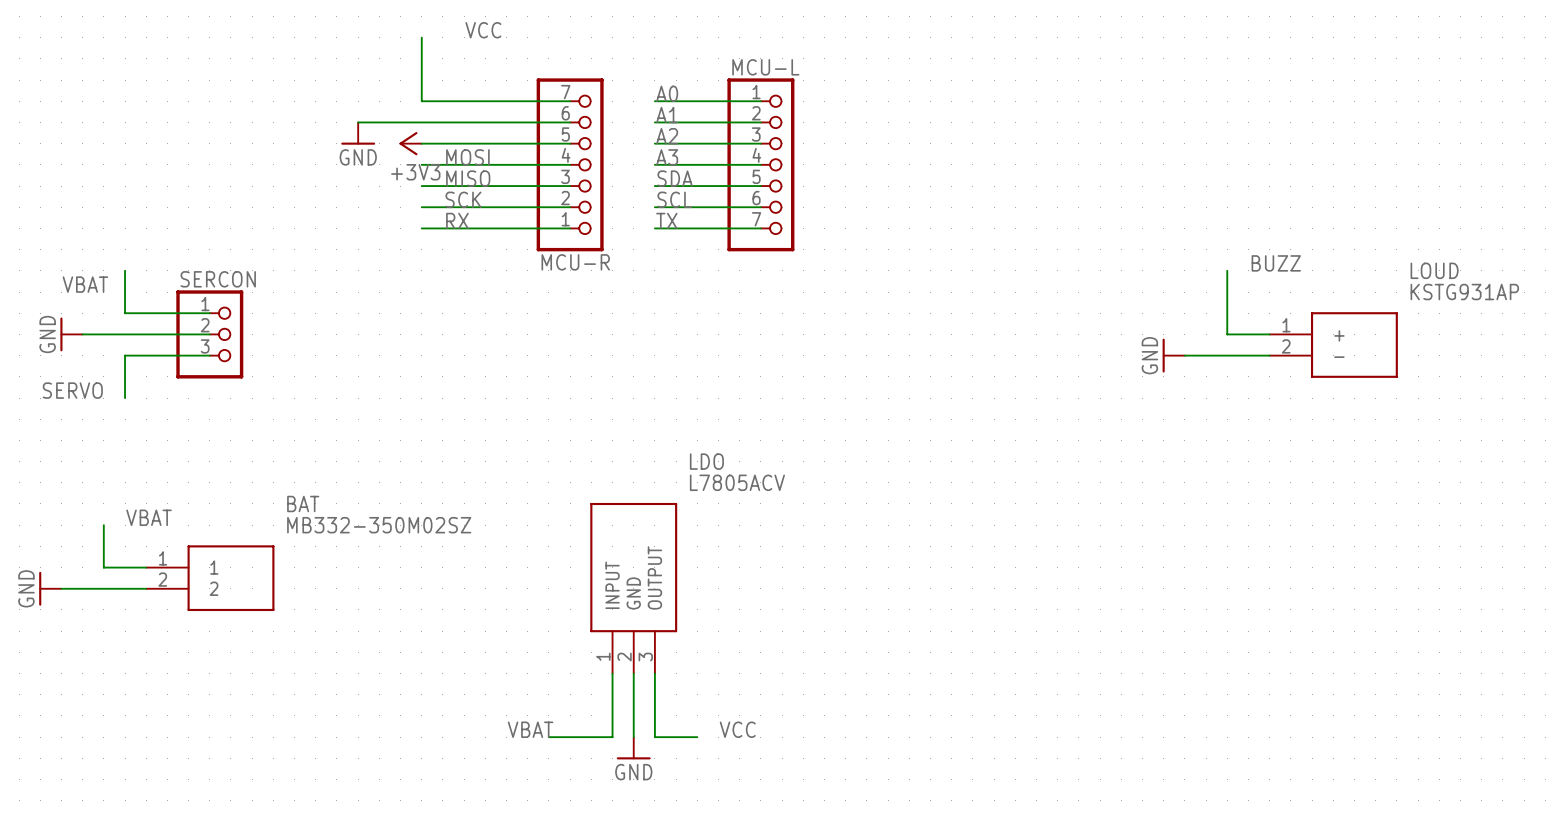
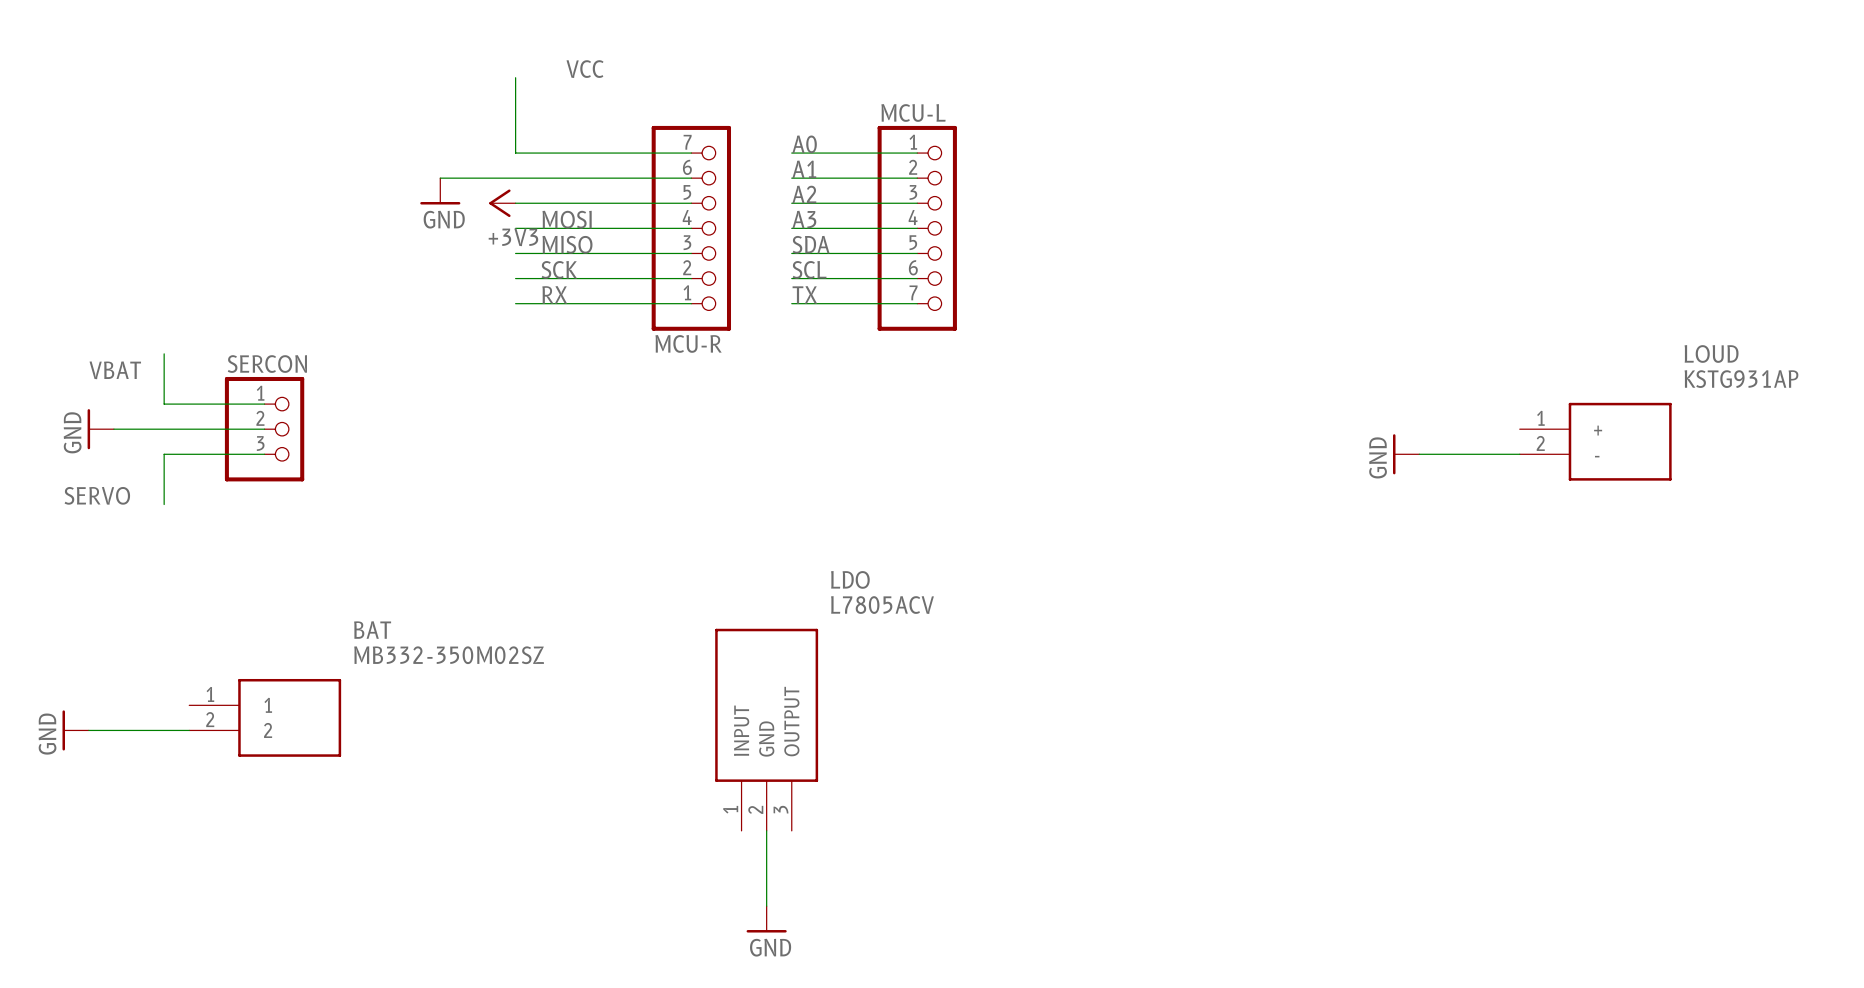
label: BUZZ (1276, 263) -> none
wire: (1227, 270) (1227, 334) (1269, 334) -> none
label: VBAT (149, 517) -> none
wire: (103, 525) (103, 567) (146, 567) -> none
wire: (612, 673) (612, 737) (548, 737) -> none
wire: (654, 673) (654, 737) (697, 737) -> none
label: VBAT (530, 729) -> none
label: VCC (737, 729) -> none

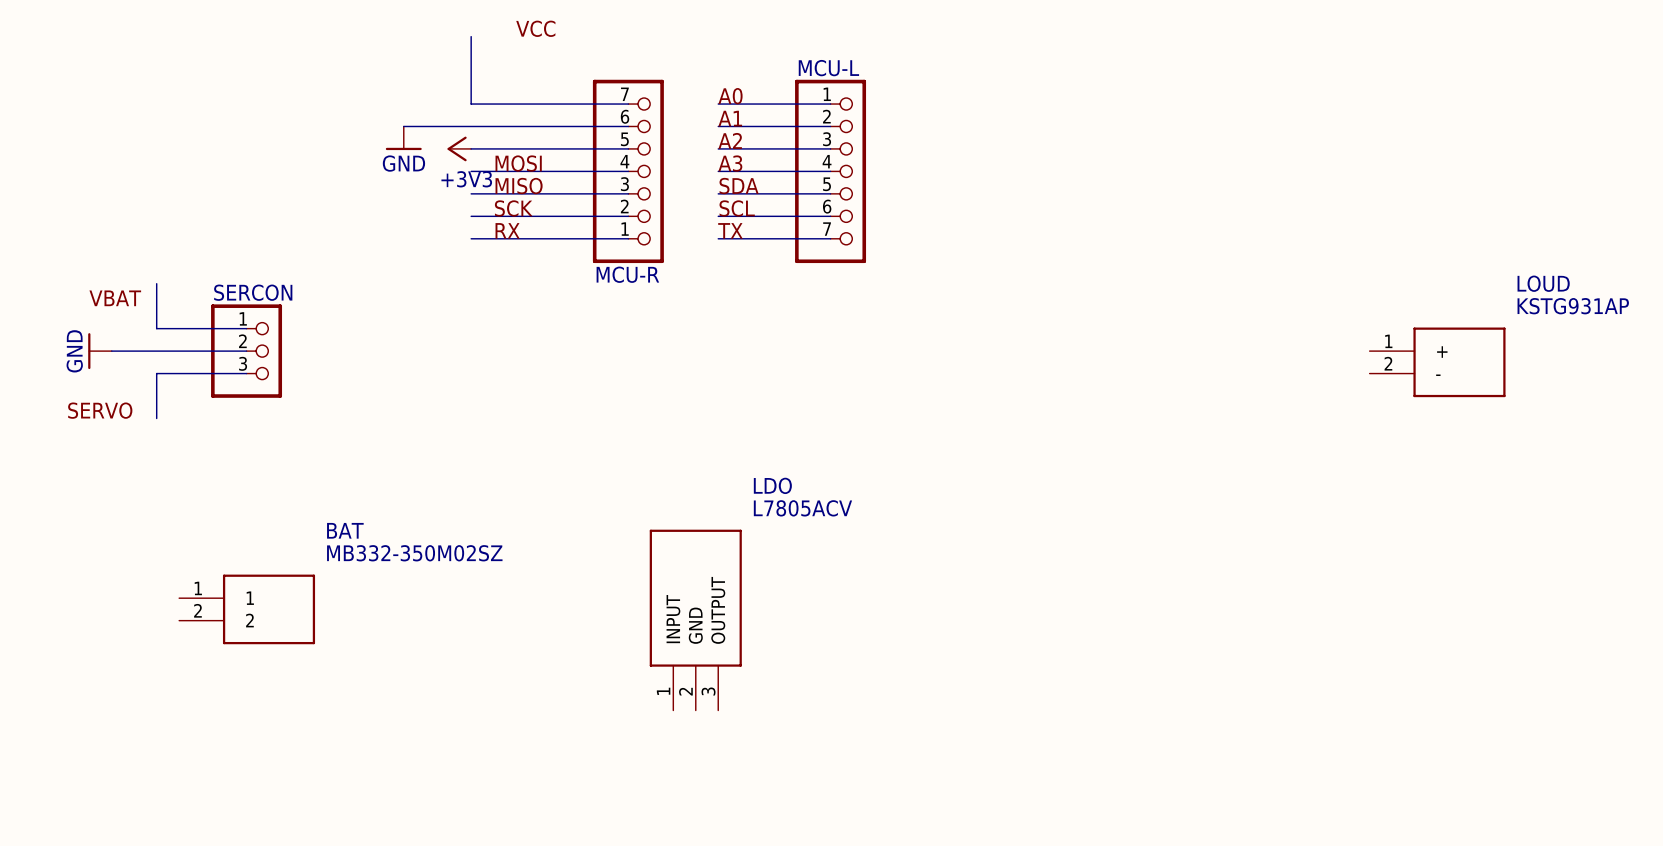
power symbol: GND (1406, 454) -> none
wire: (1419, 454) (1519, 454) -> none
power symbol: GND (75, 730) -> none
wire: (88, 730) (189, 730) -> none
wire: (766, 830) (766, 906) -> none
power symbol: GND (766, 919) -> none

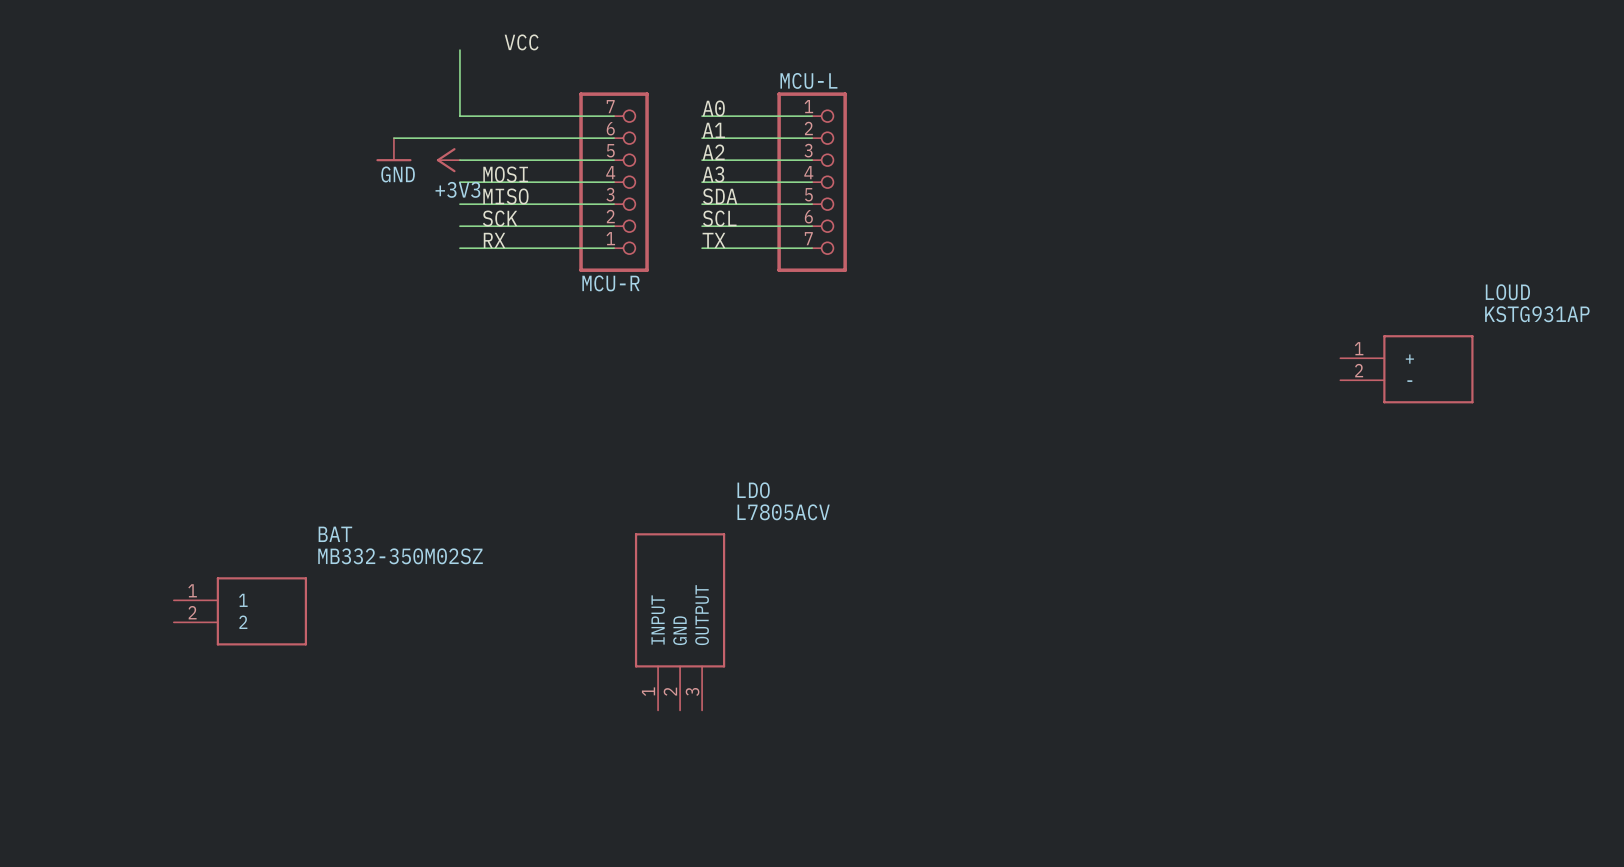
wire: (156, 283) (156, 328) (246, 328) -> none
label: VBAT (115, 298) -> none
power symbol: GND (99, 351) -> none
wire: (111, 351) (246, 351) -> none
SERCON: (246, 351) -> none
wire: (246, 373) (156, 373) (156, 418) -> none
label: SERVO (100, 410) -> none

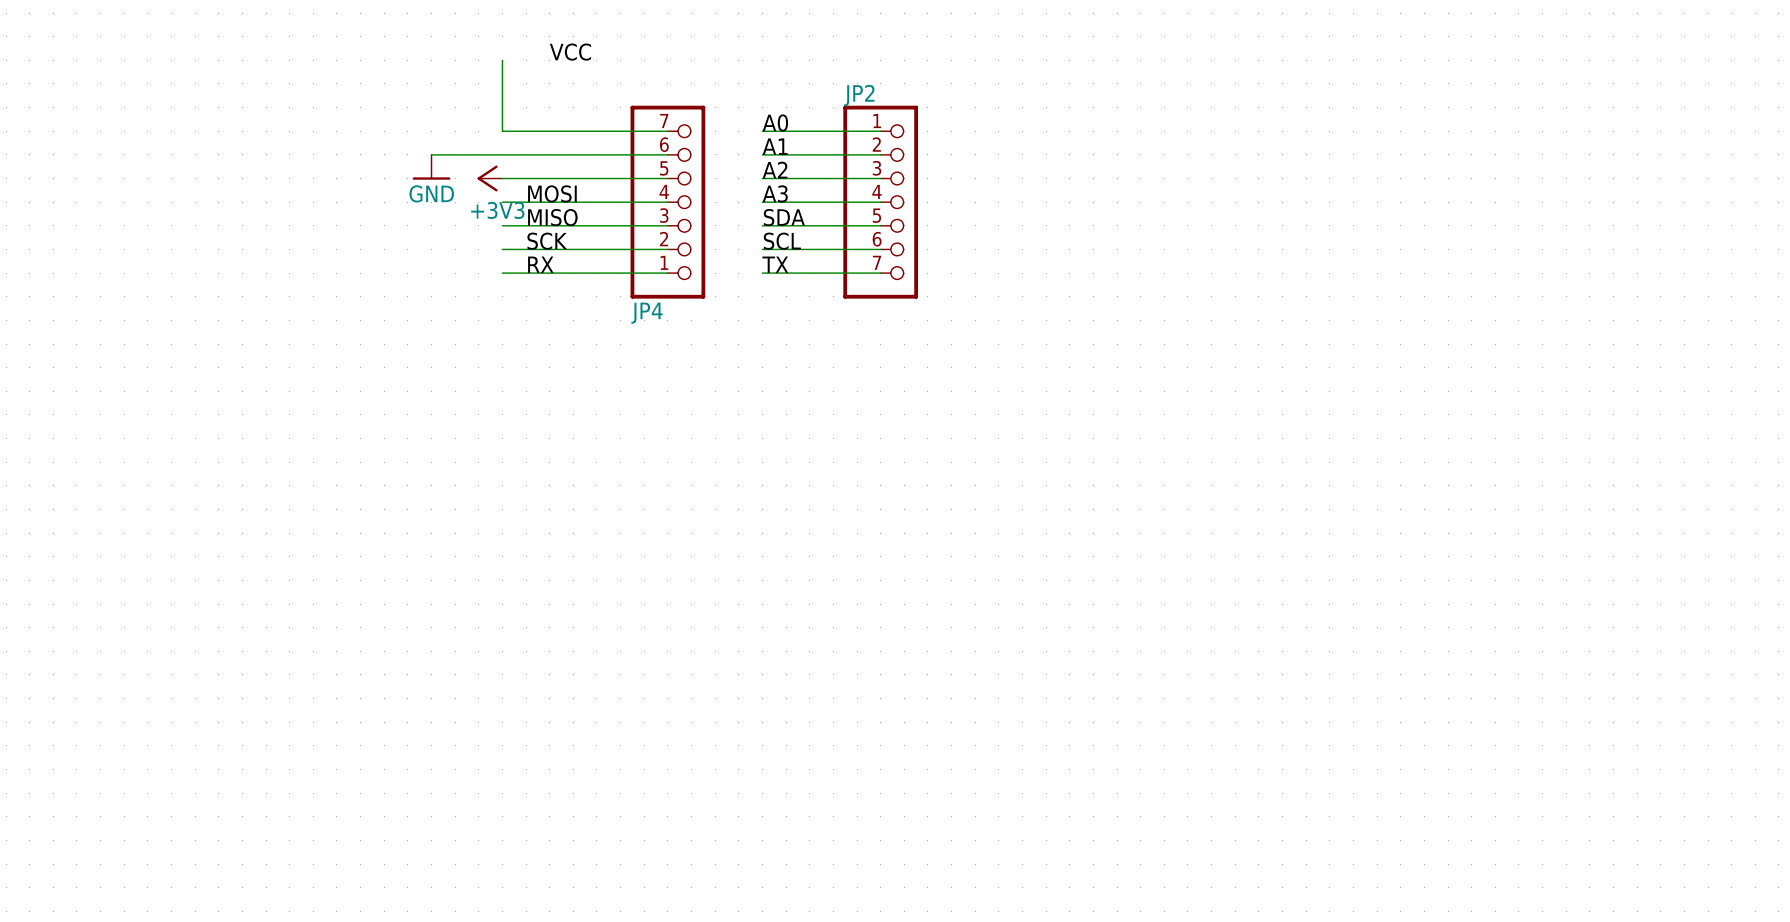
MCU-L name: MCU-L (808, 80) -> JP2 (859, 95)
MCU-R name: MCU-R (610, 283) -> JP4 (647, 313)
LOUD: KSTG931AP (1406, 369) -> none
BAT: MB332-350M02SZ (240, 611) -> none
LDO: L7805ACV (680, 621) -> none

